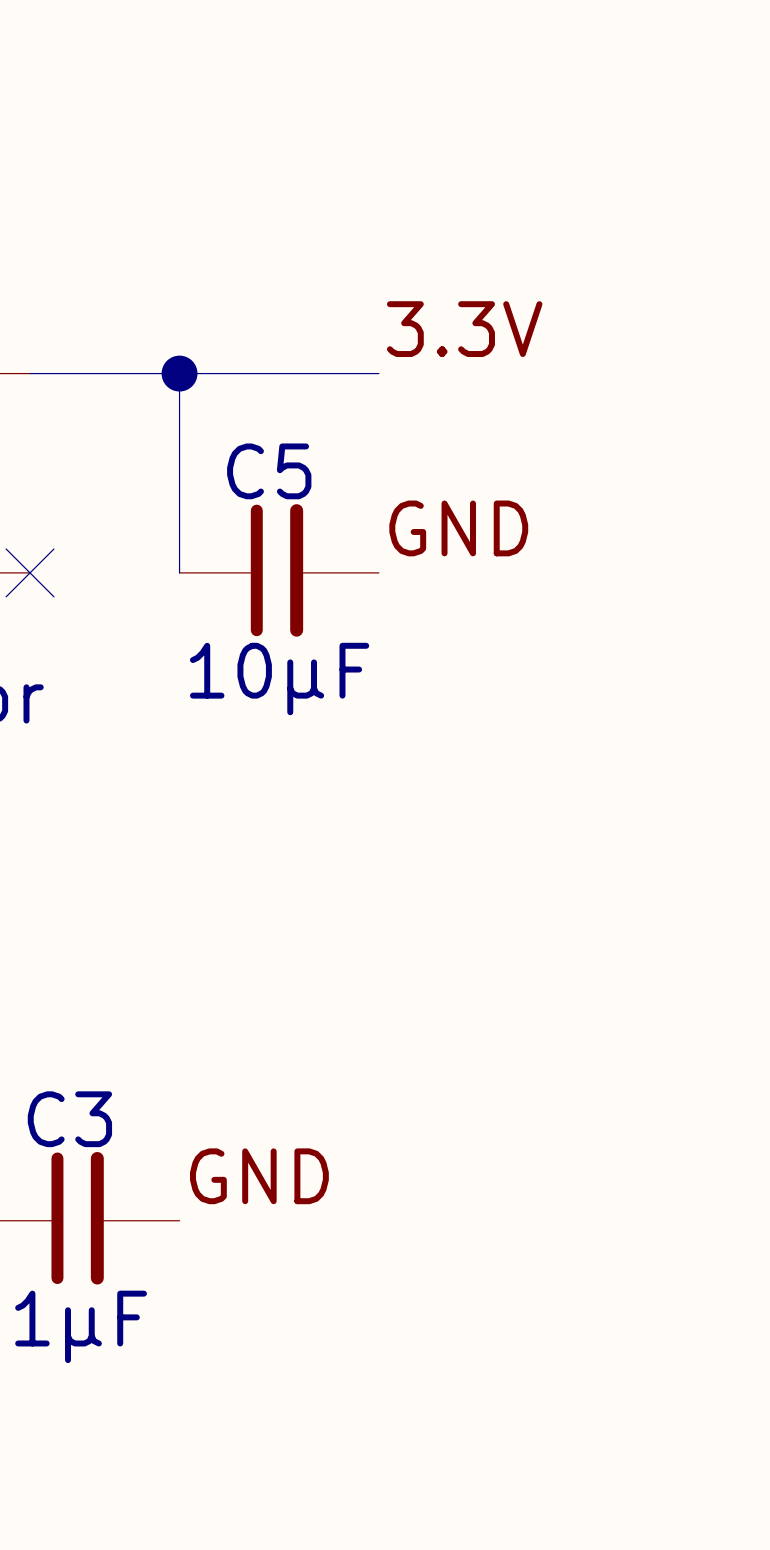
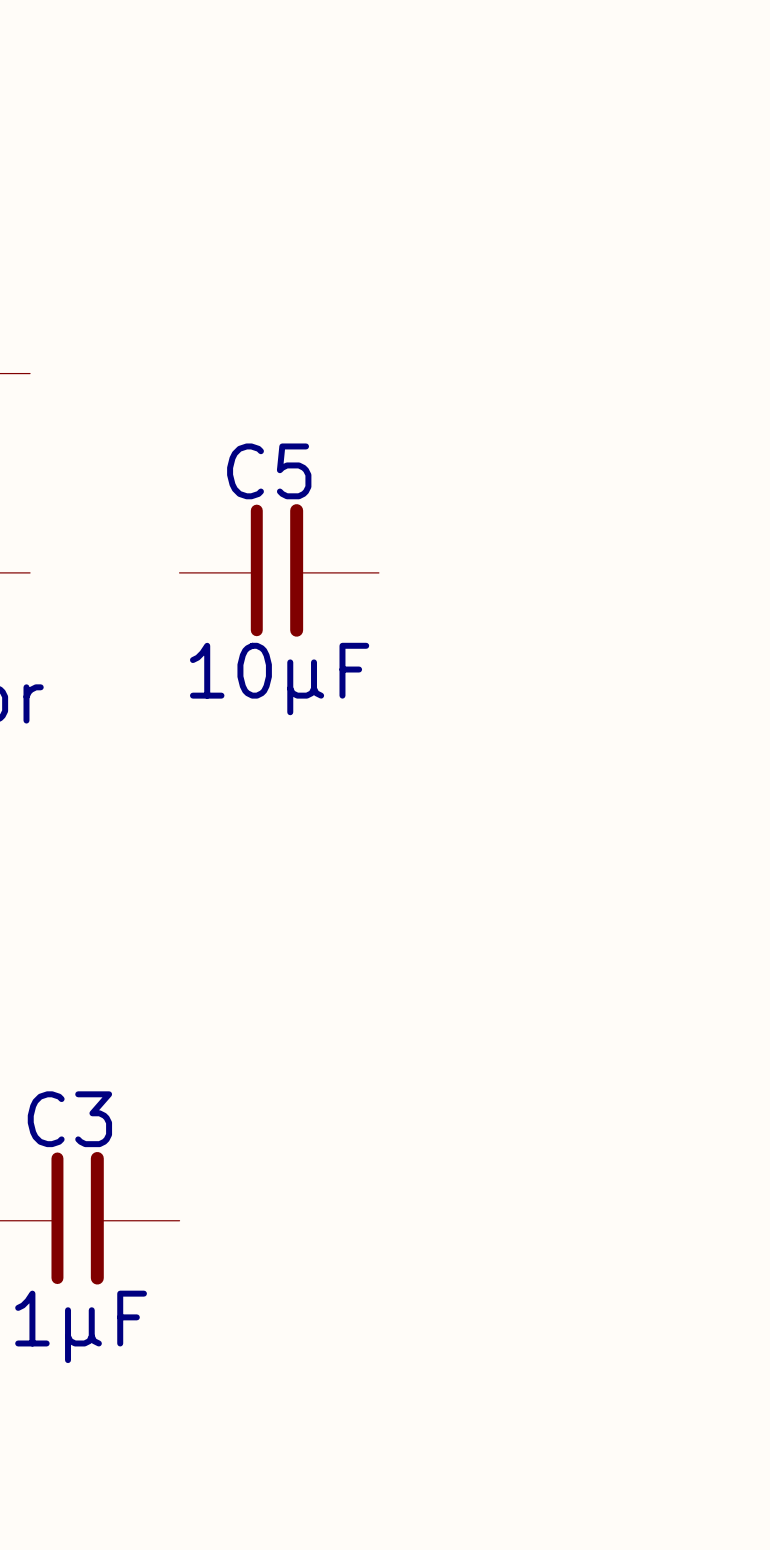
label: 3.3V (464, 329) -> none
wire: (30, 373) (378, 373) -> none
wire: (179, 373) (179, 572) -> none
junction: (179, 373) -> none
label: GND (458, 528) -> none
no-connect mark: (30, 572) -> none
label: GND (259, 1176) -> none

